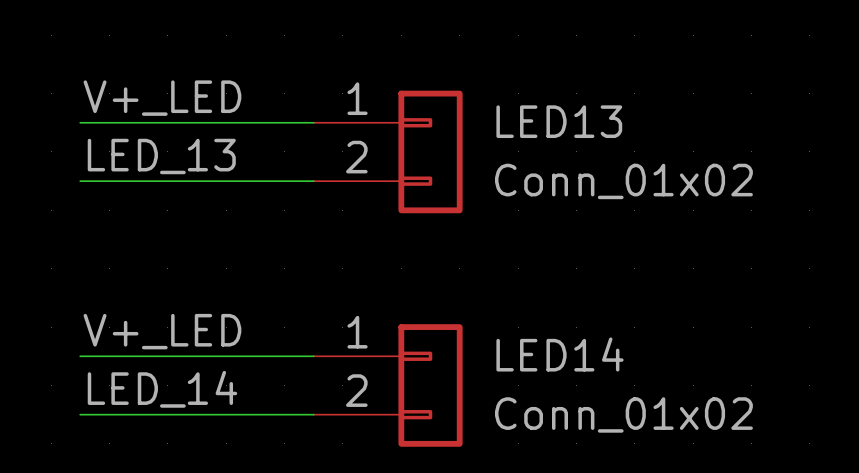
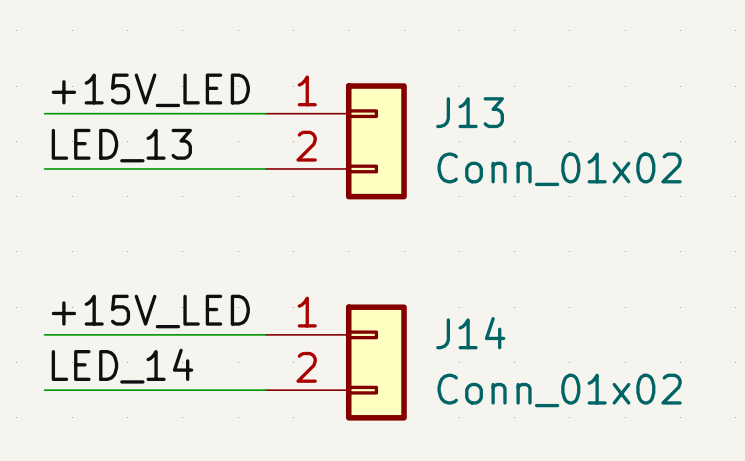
label: V+_LED (162, 98) -> +15V_LED (150, 90)
LED13 name: LED13 (559, 121) -> J13 (470, 112)
label: V+_LED (162, 331) -> +15V_LED (150, 311)
LED14 name: LED14 (559, 354) -> J14 (470, 333)

